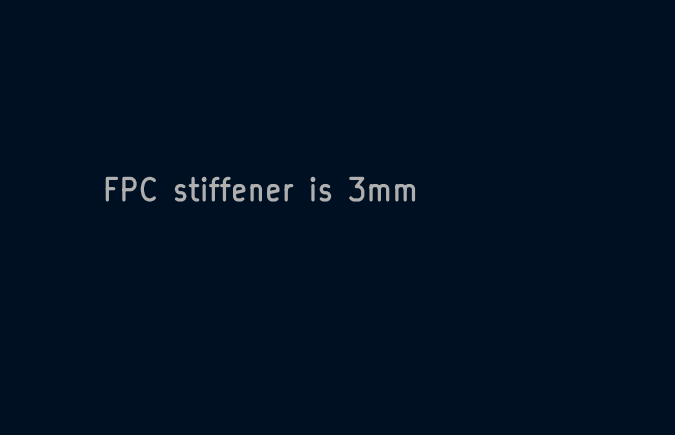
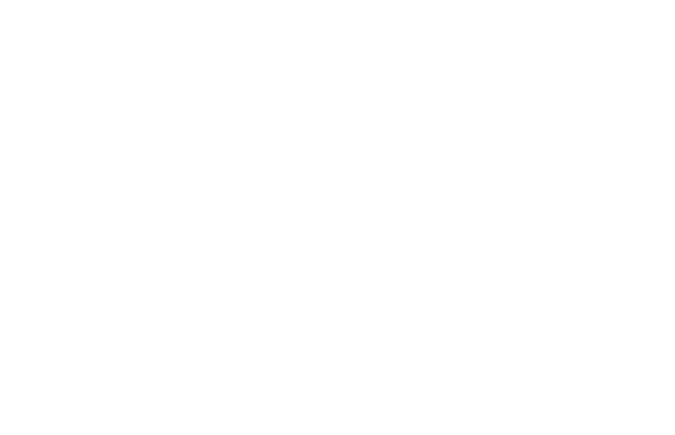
text: FPC stiffener is 3mm (260, 189) -> none

